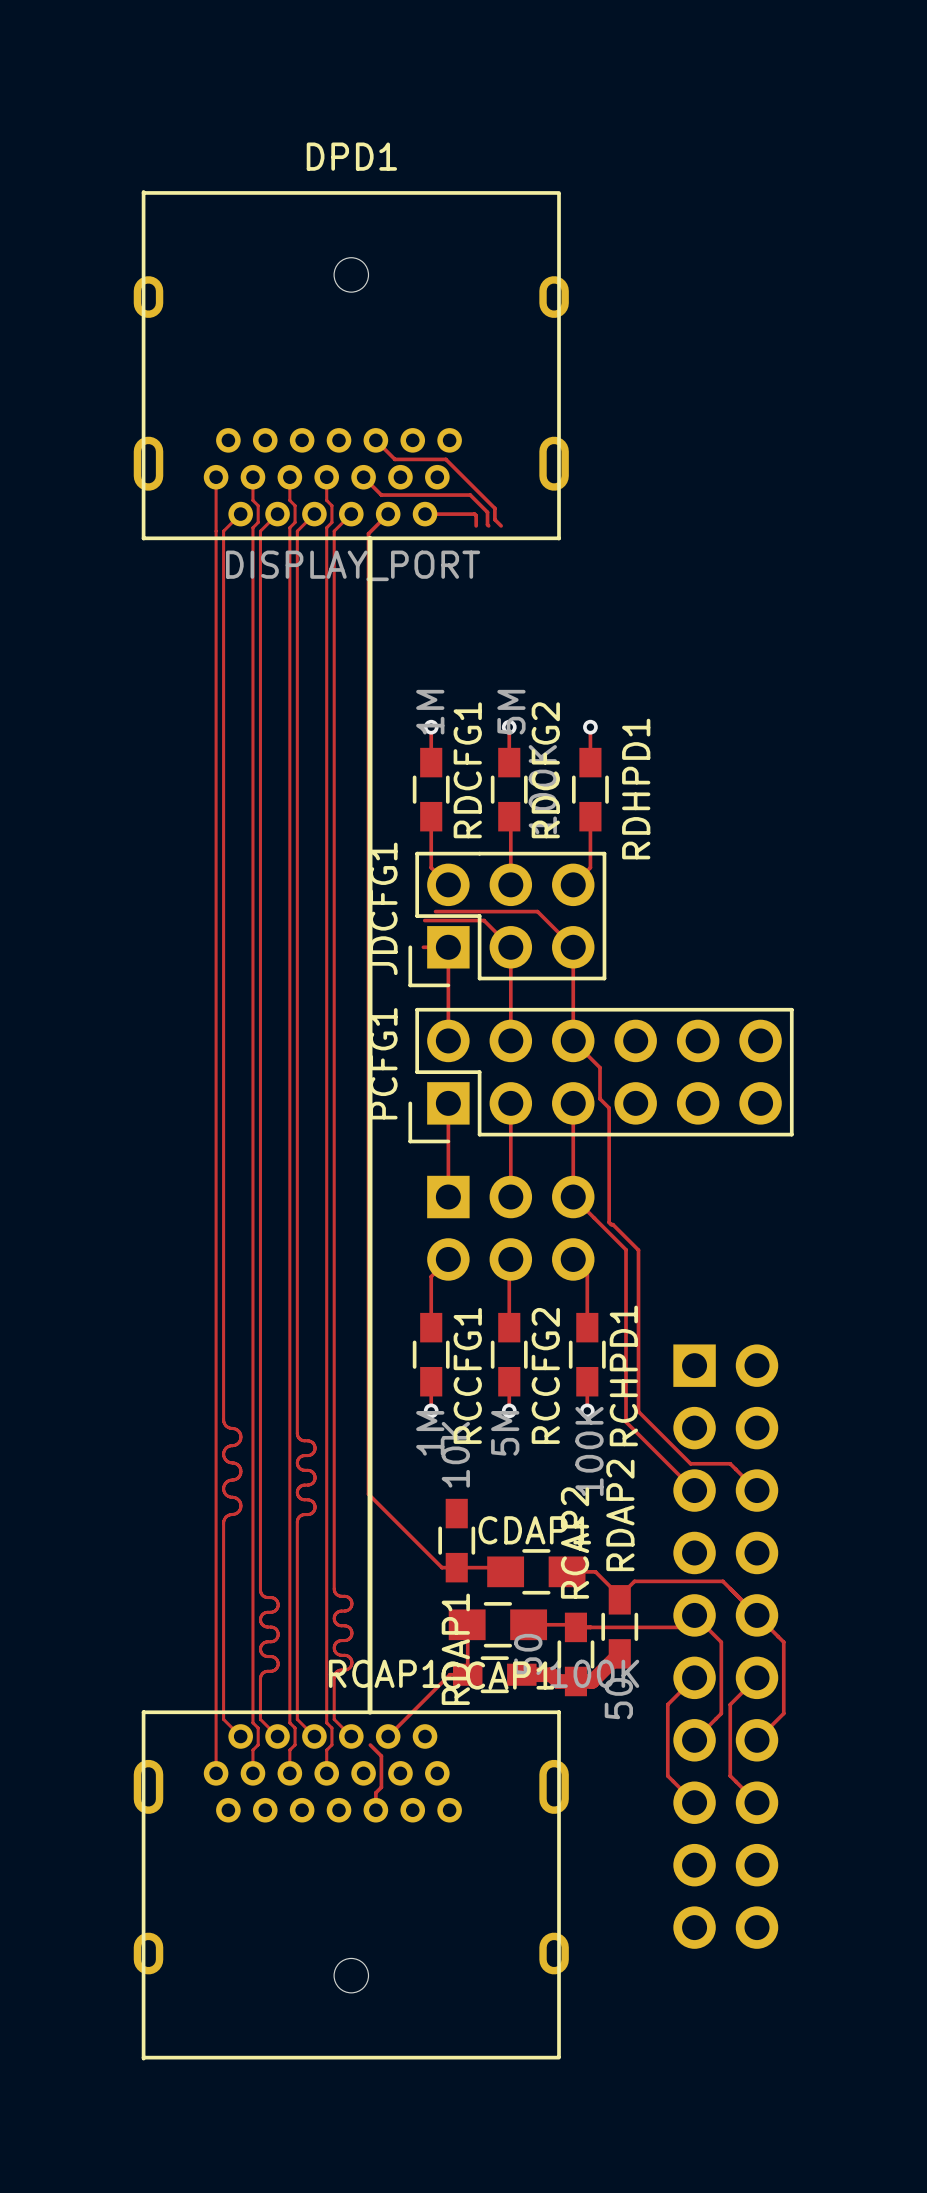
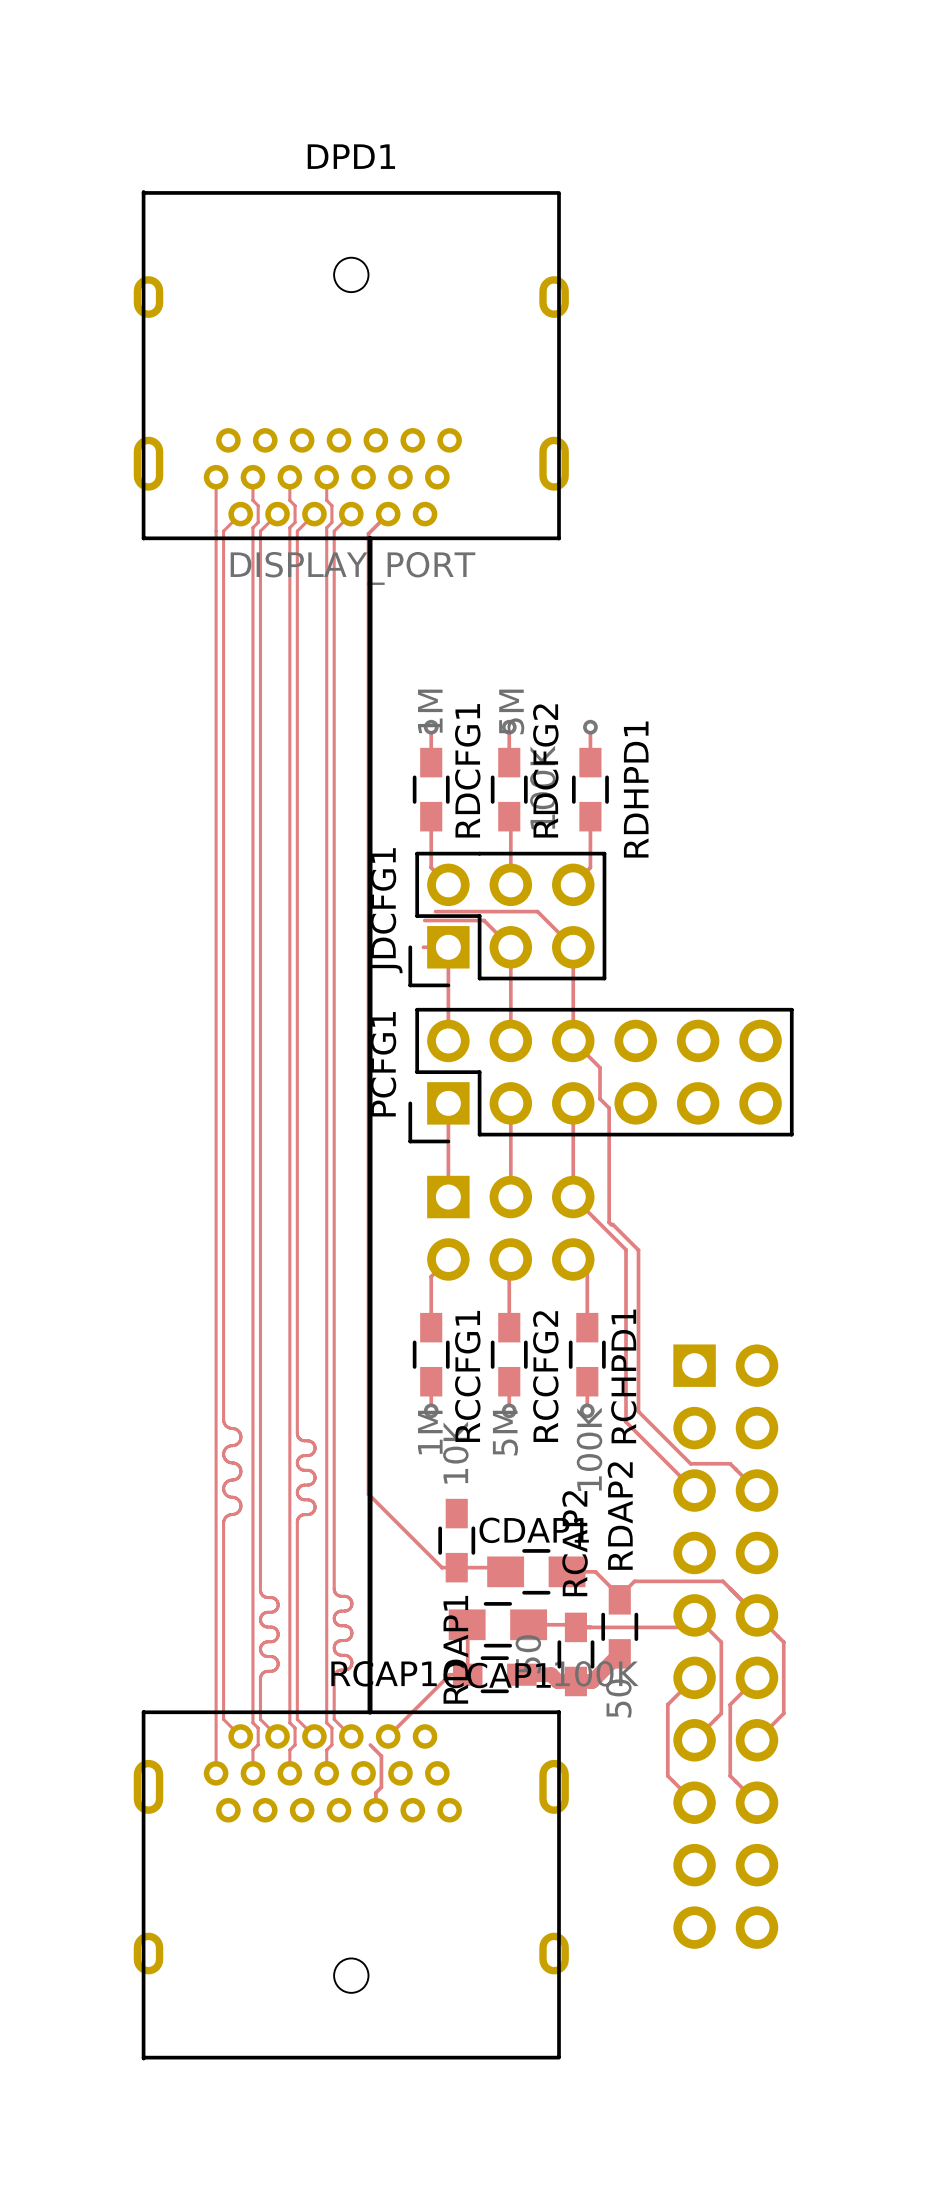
track: (375, 440) (394, 459) (445, 459) (494, 508) (494, 519) (501, 525) -> none
track: (363, 477) (381, 495) (470, 495) (487, 512) (488, 525) -> none
track: (425, 514) (474, 514) (476, 525) -> none

